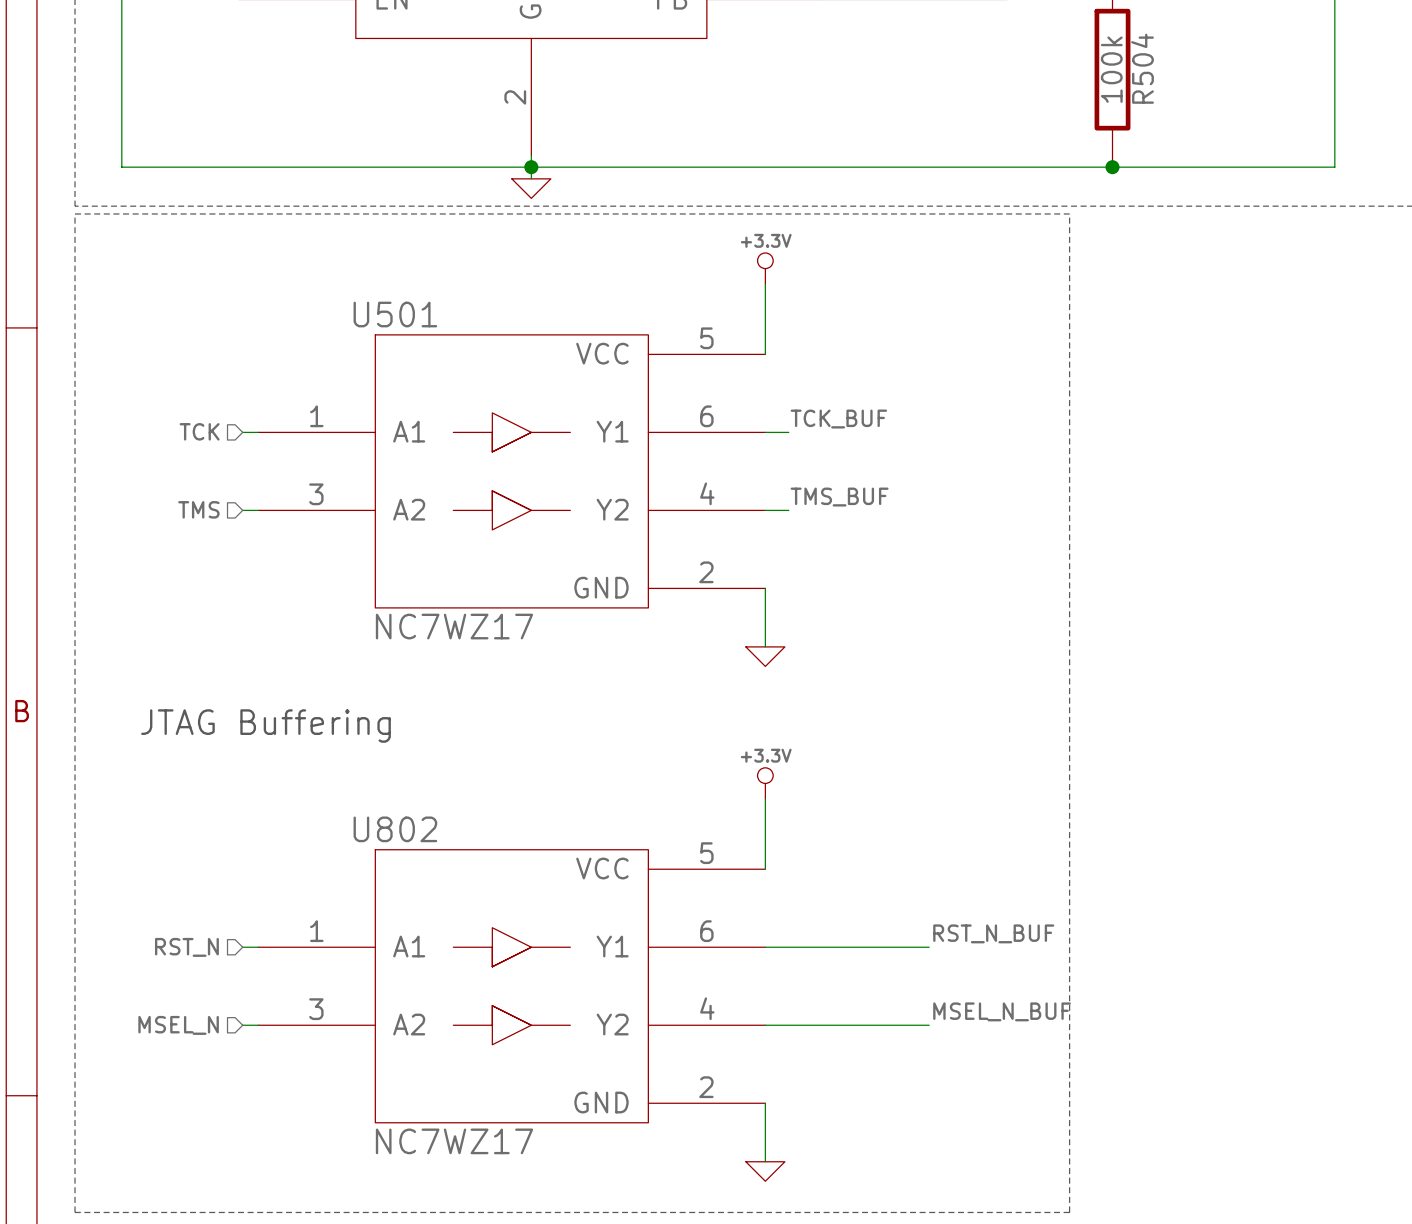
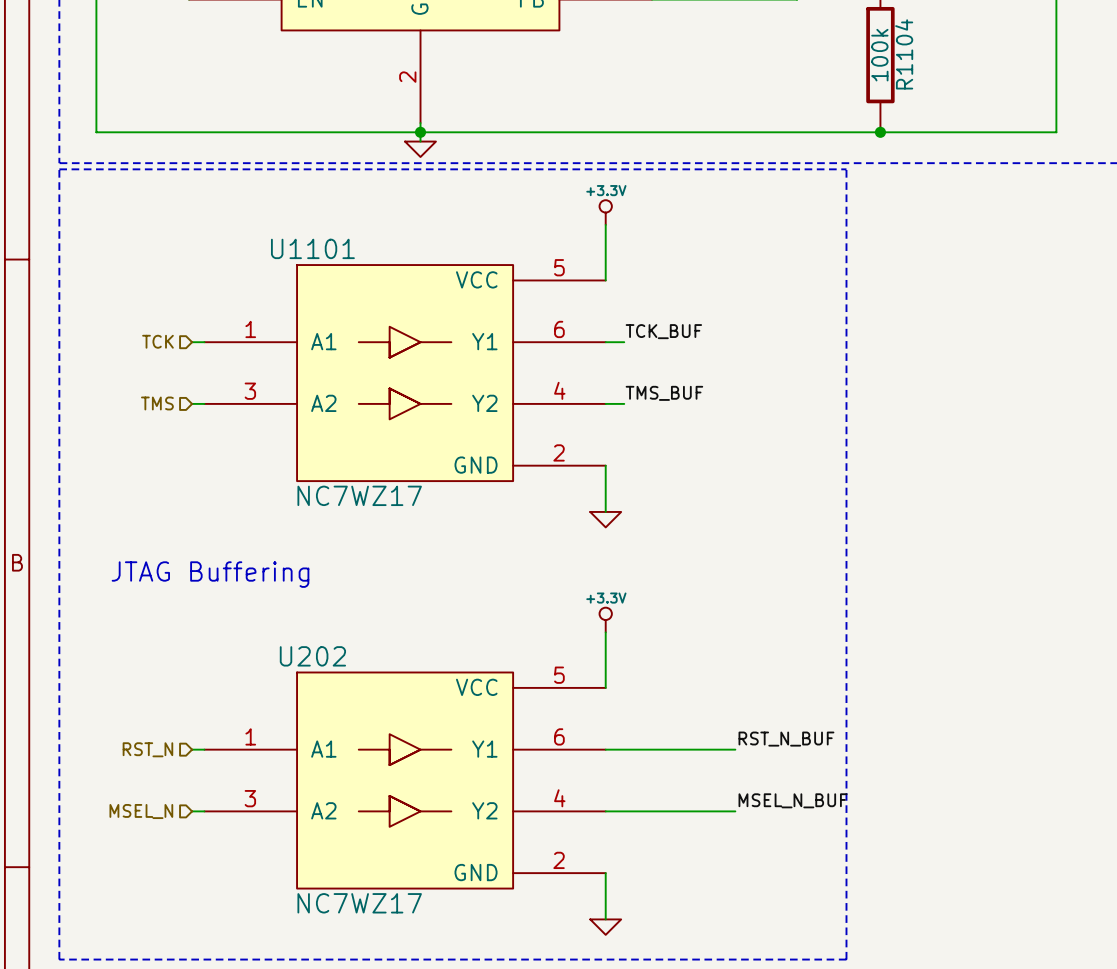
R504 name: R504 (1142, 68) -> R1104 (904, 54)
U501 name: U501 (395, 314) -> U1101 (312, 248)
U802 name: U802 (395, 829) -> U202 (312, 656)

